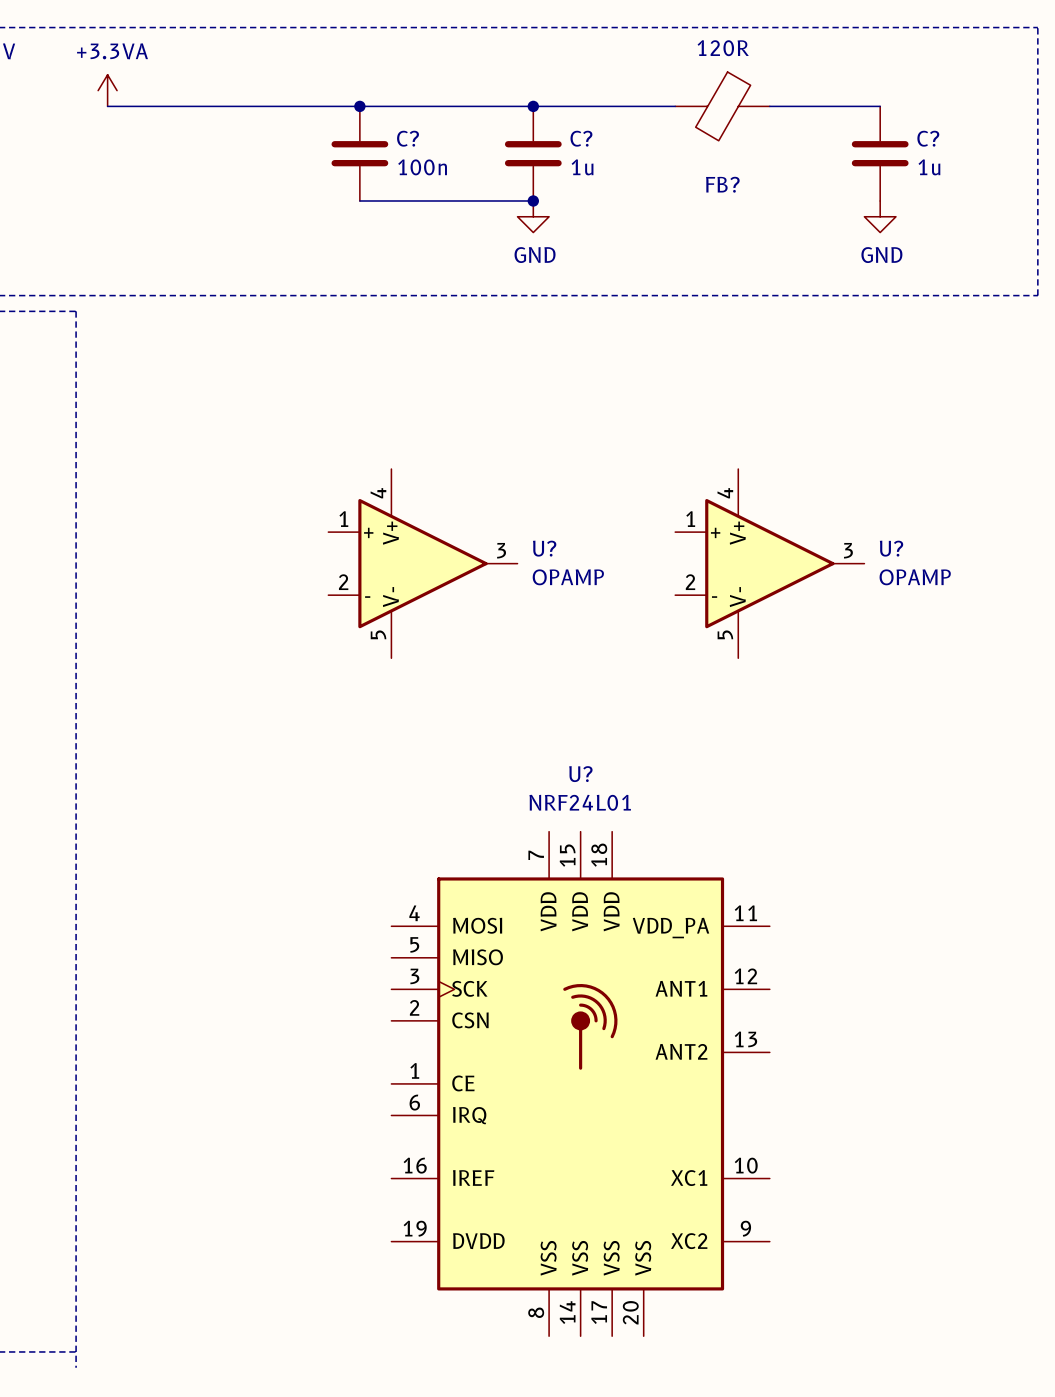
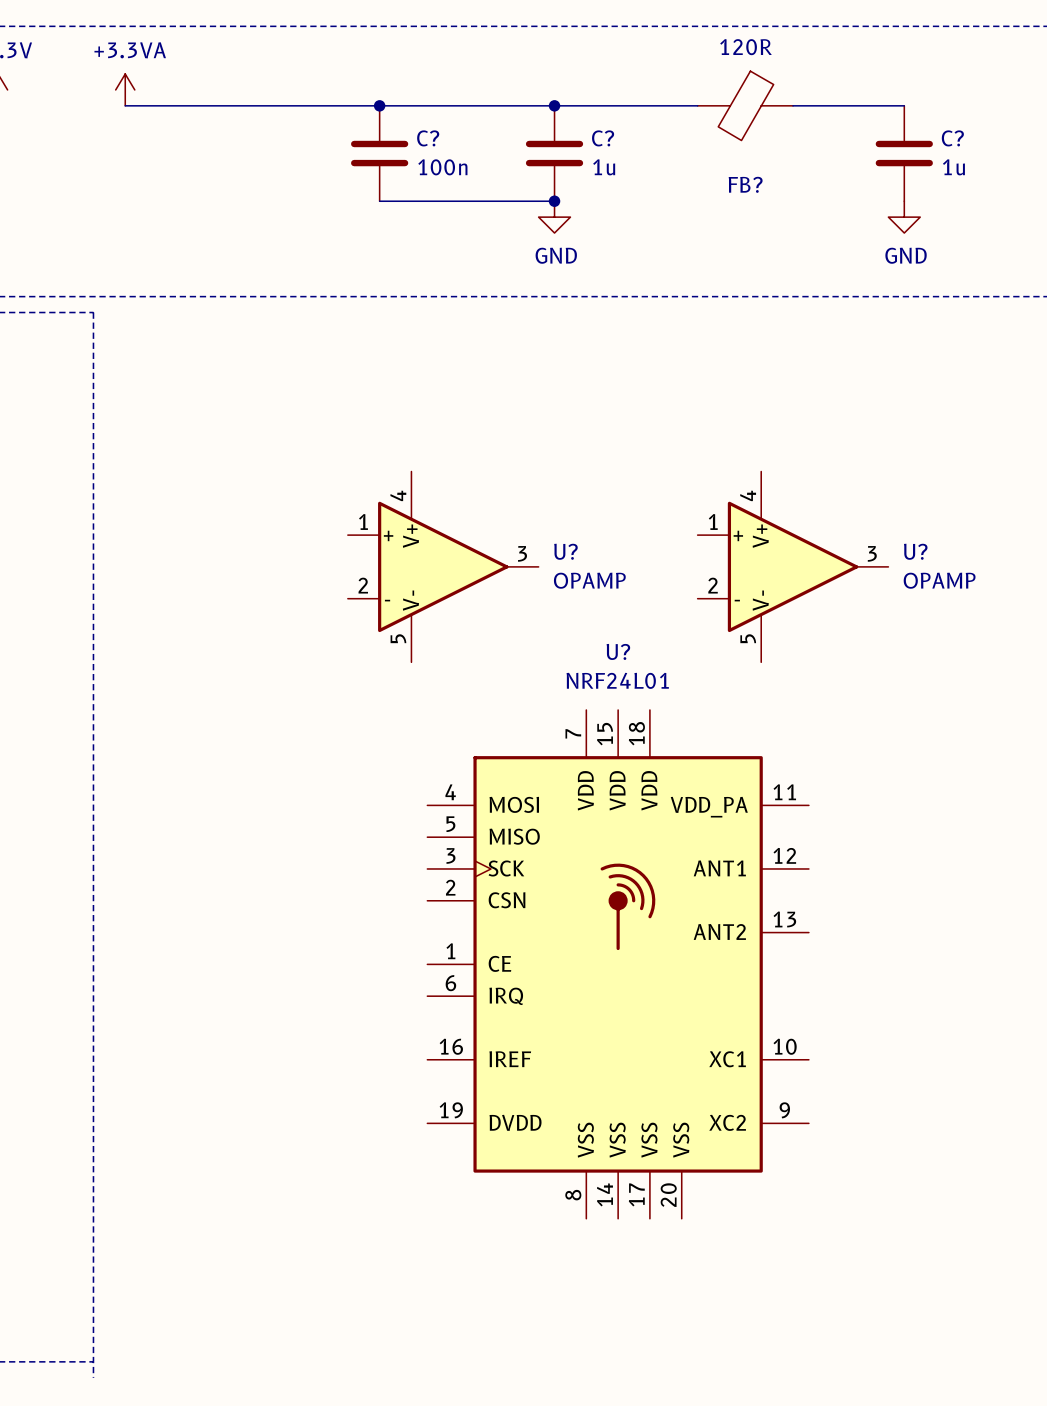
U? position: (580, 1083) -> (618, 964)

